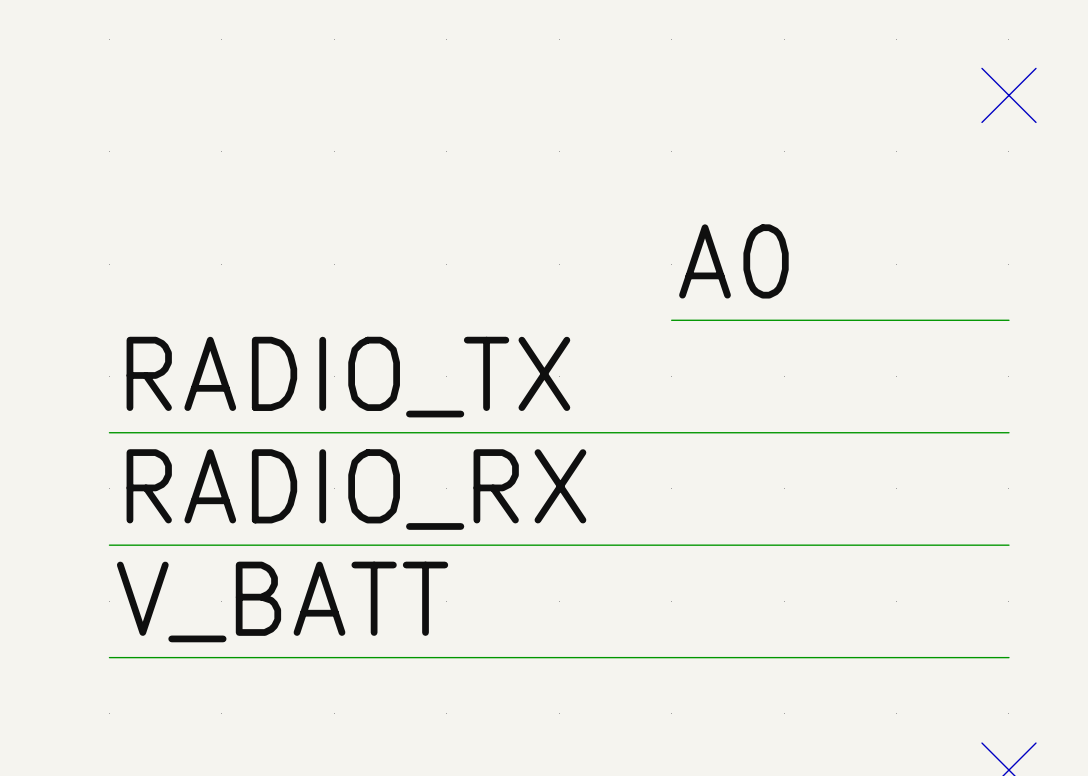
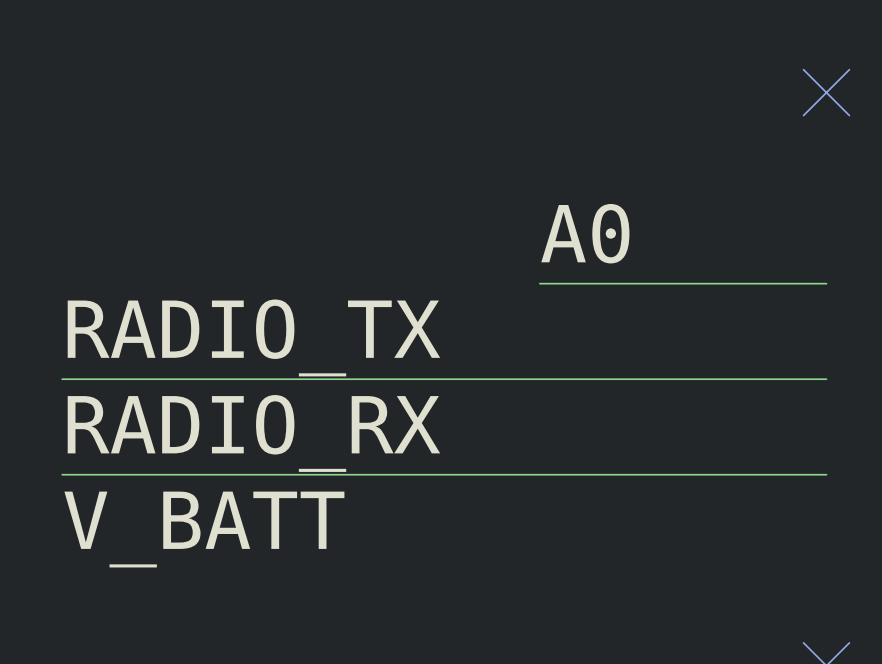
wire: (109, 657) (1008, 657) -> none

